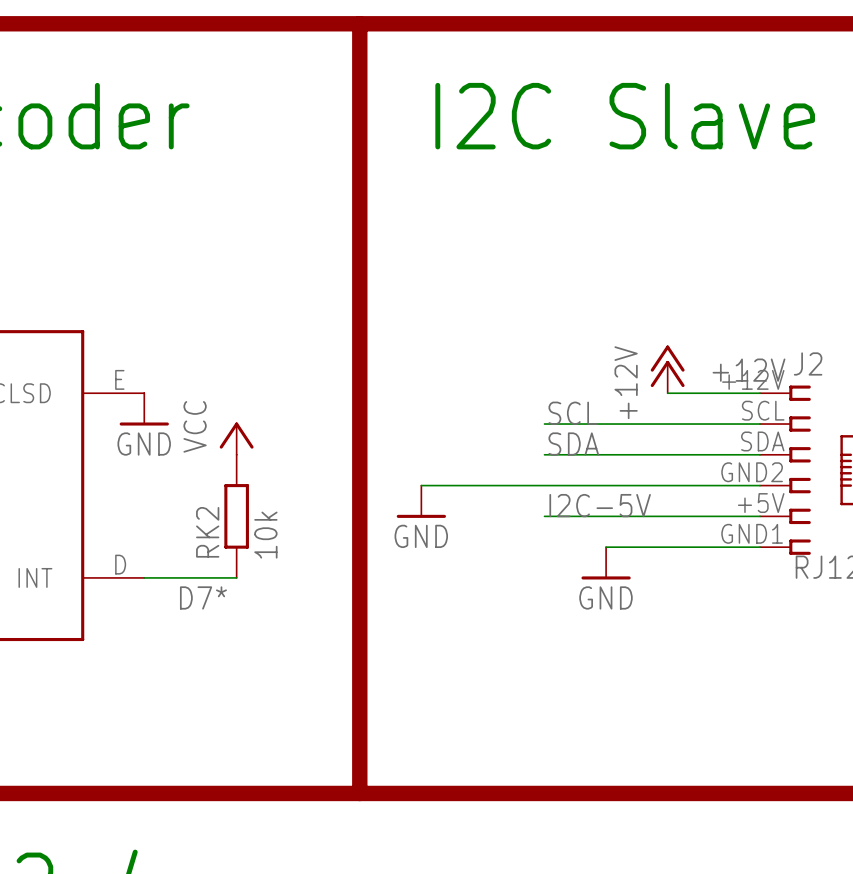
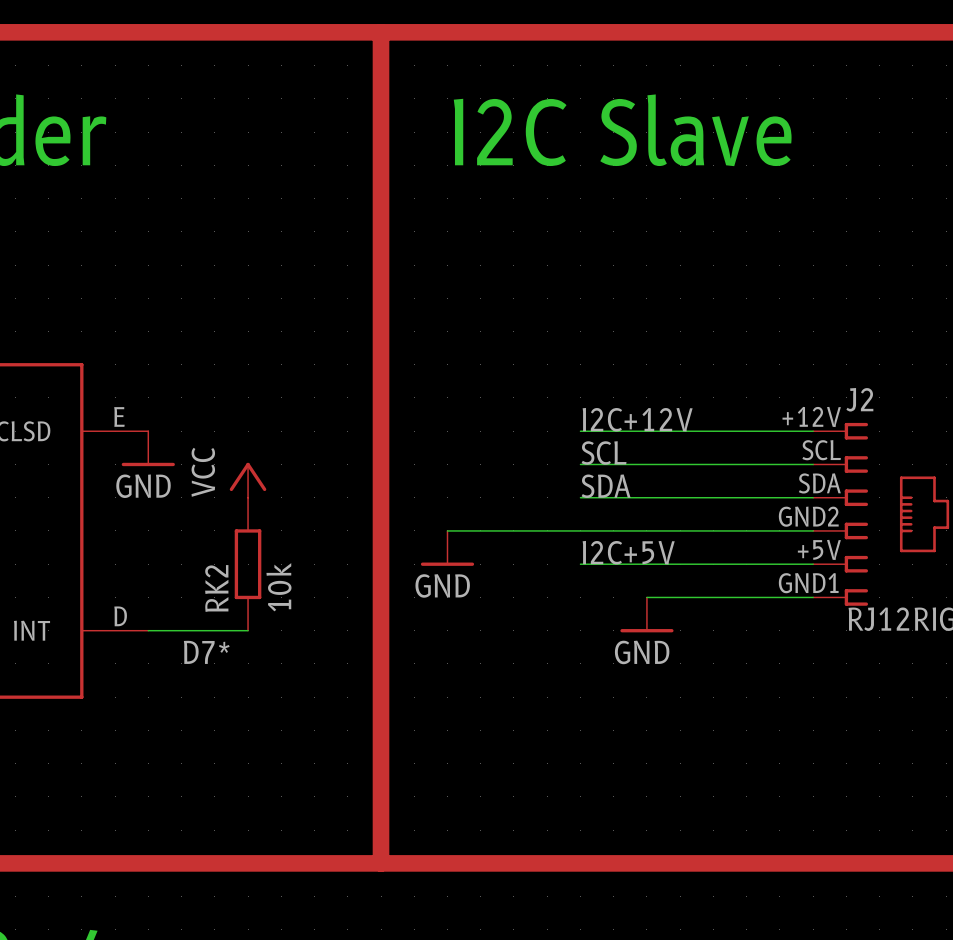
power symbol: +12V (667, 369) -> none
label: +12V (749, 370) -> none
label: none -> I2C+12V (637, 419)
wire: none -> (580, 431) (713, 431)
label: I2C-5V (600, 505) -> I2C+5V (628, 552)

